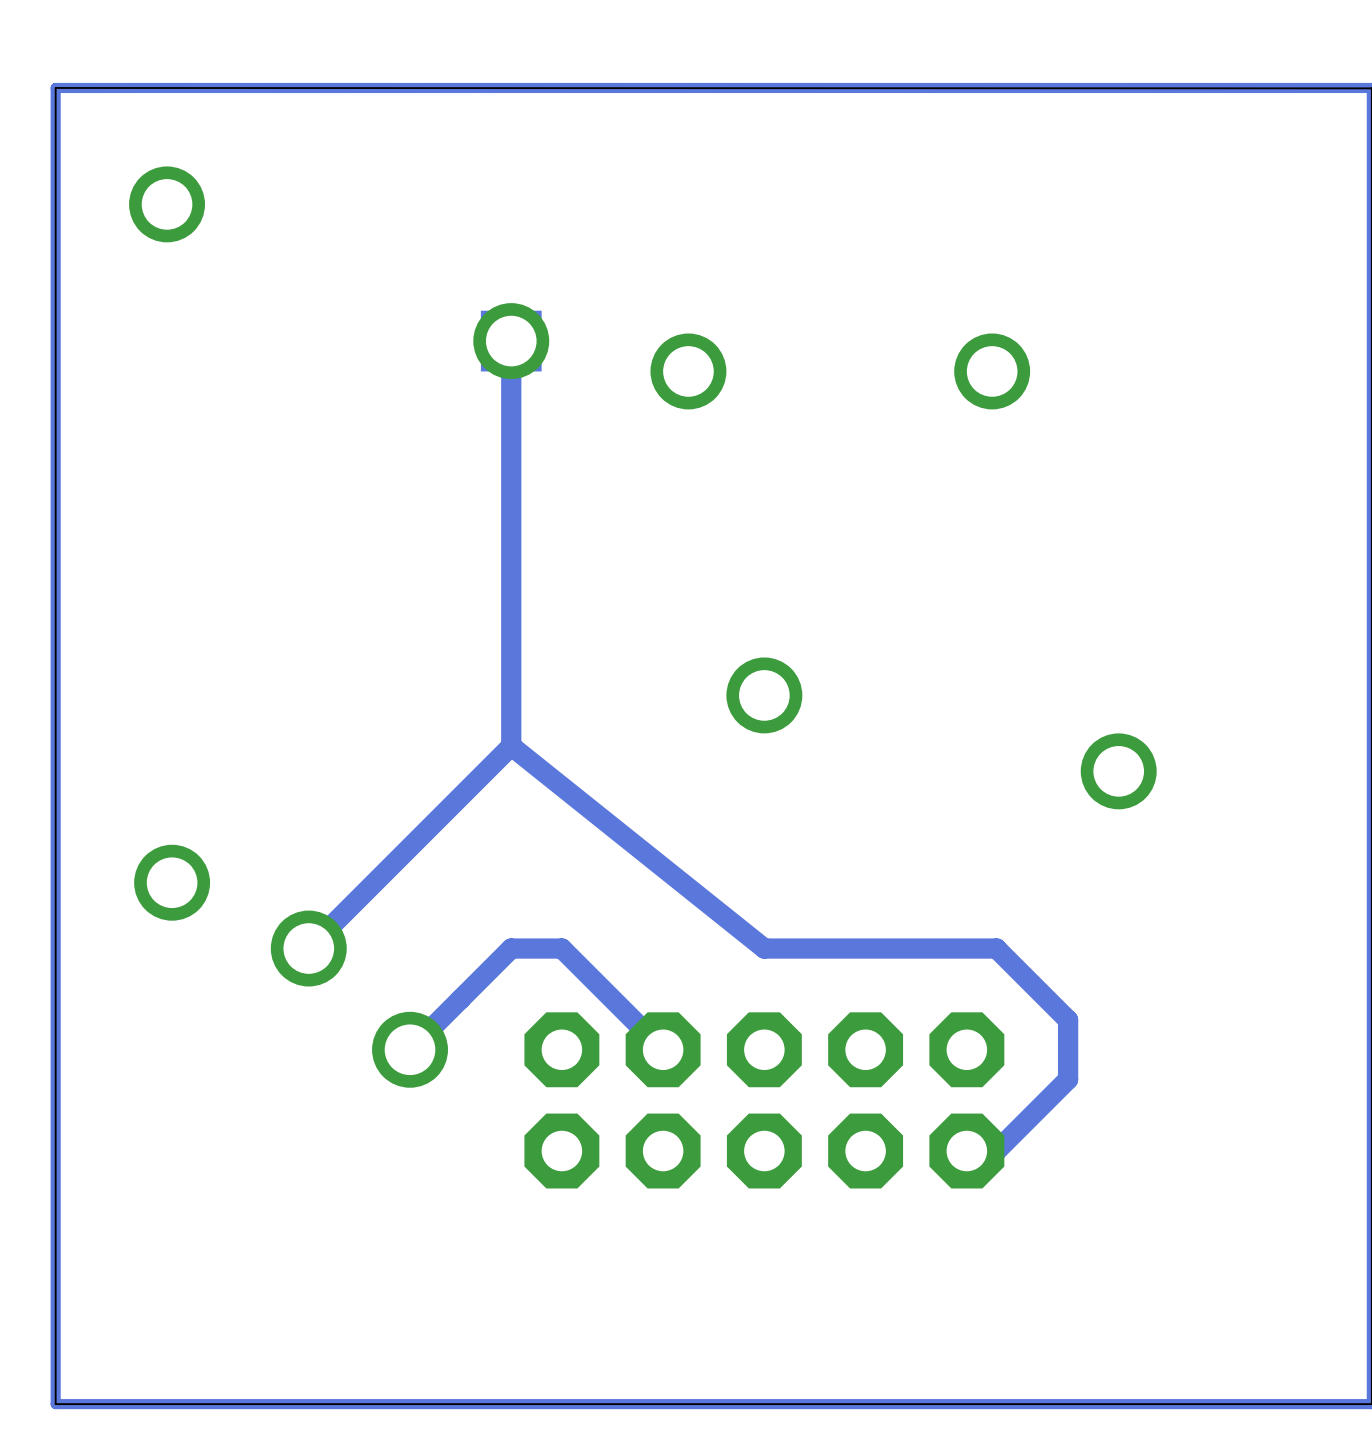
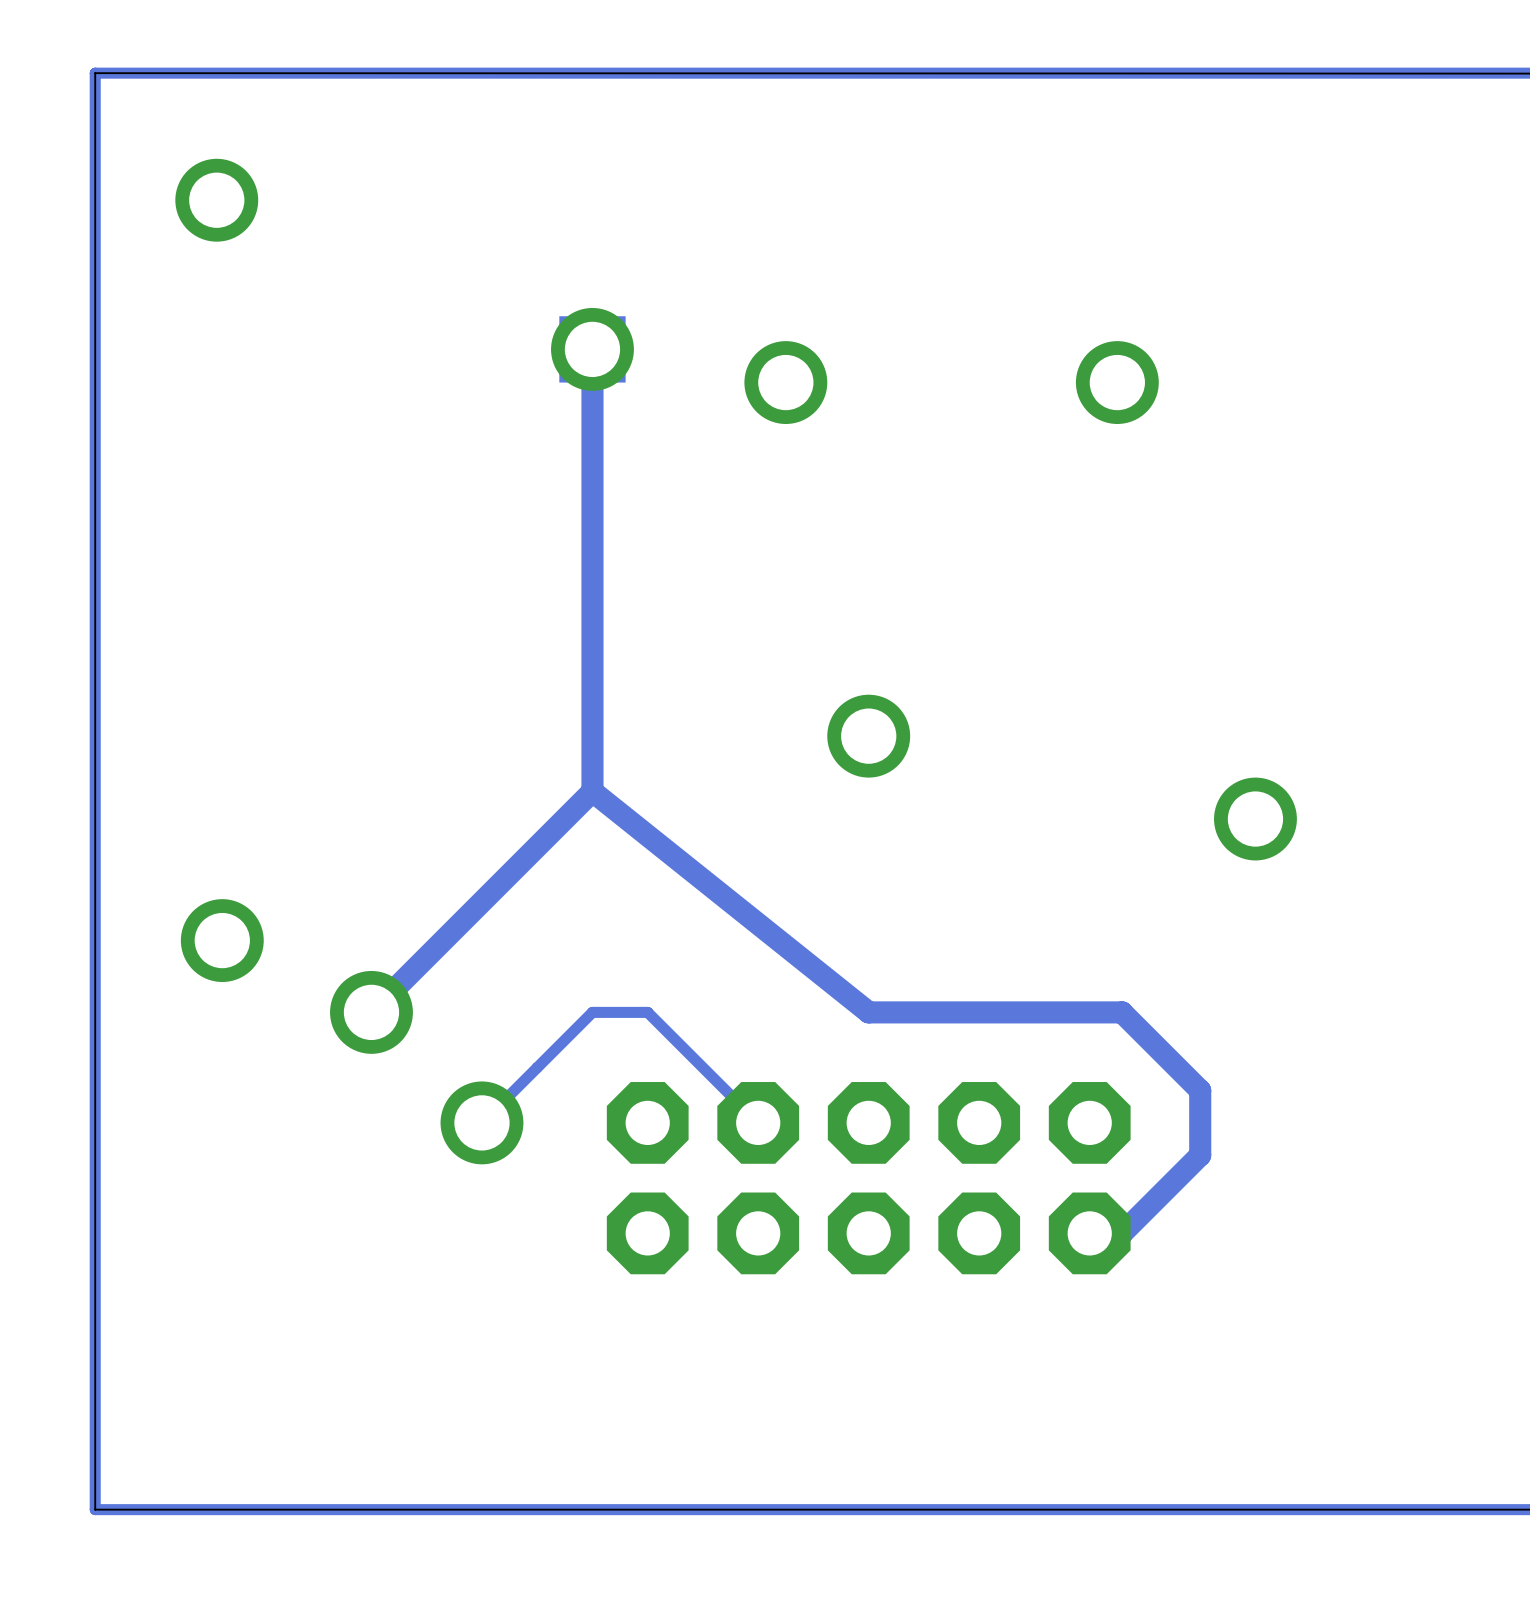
track width: thick (663, 1049) (561, 948) (511, 948) (410, 1049) -> thin (758, 1122) (647, 1012) (592, 1012) (481, 1122)

